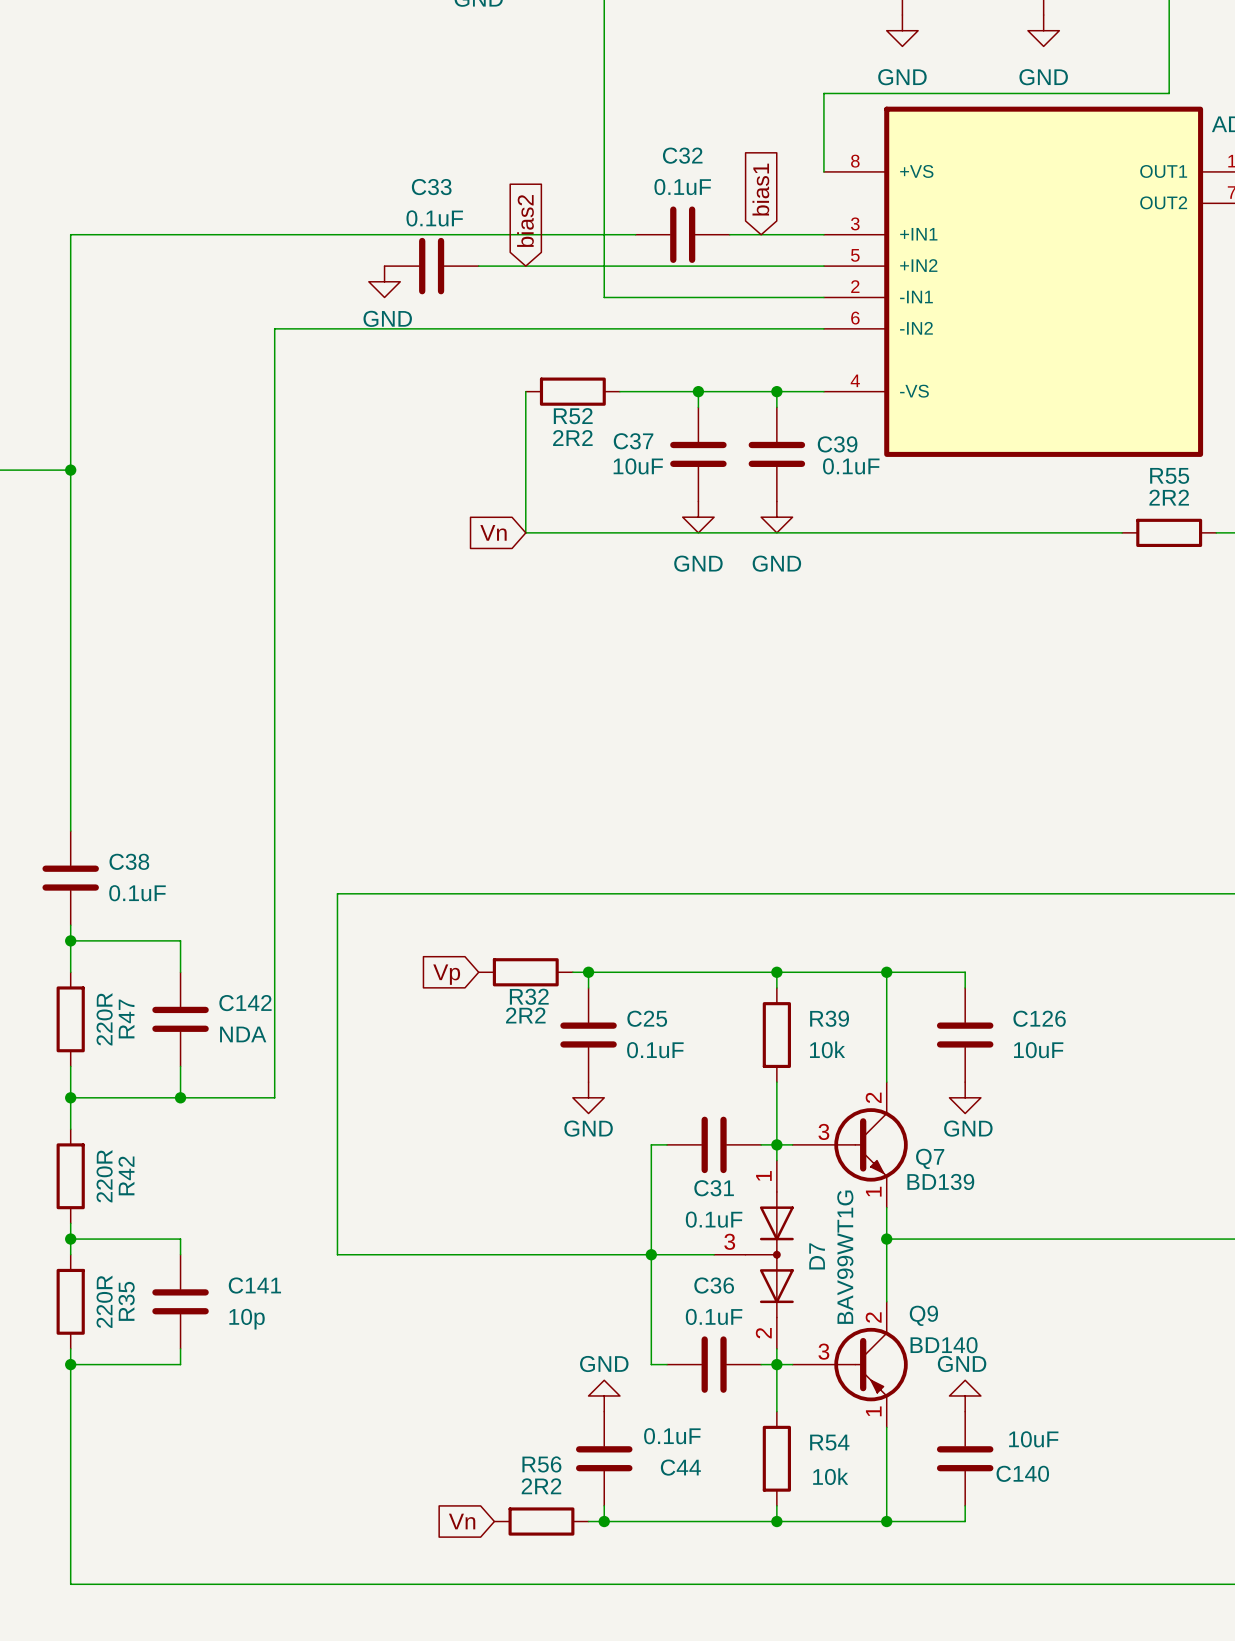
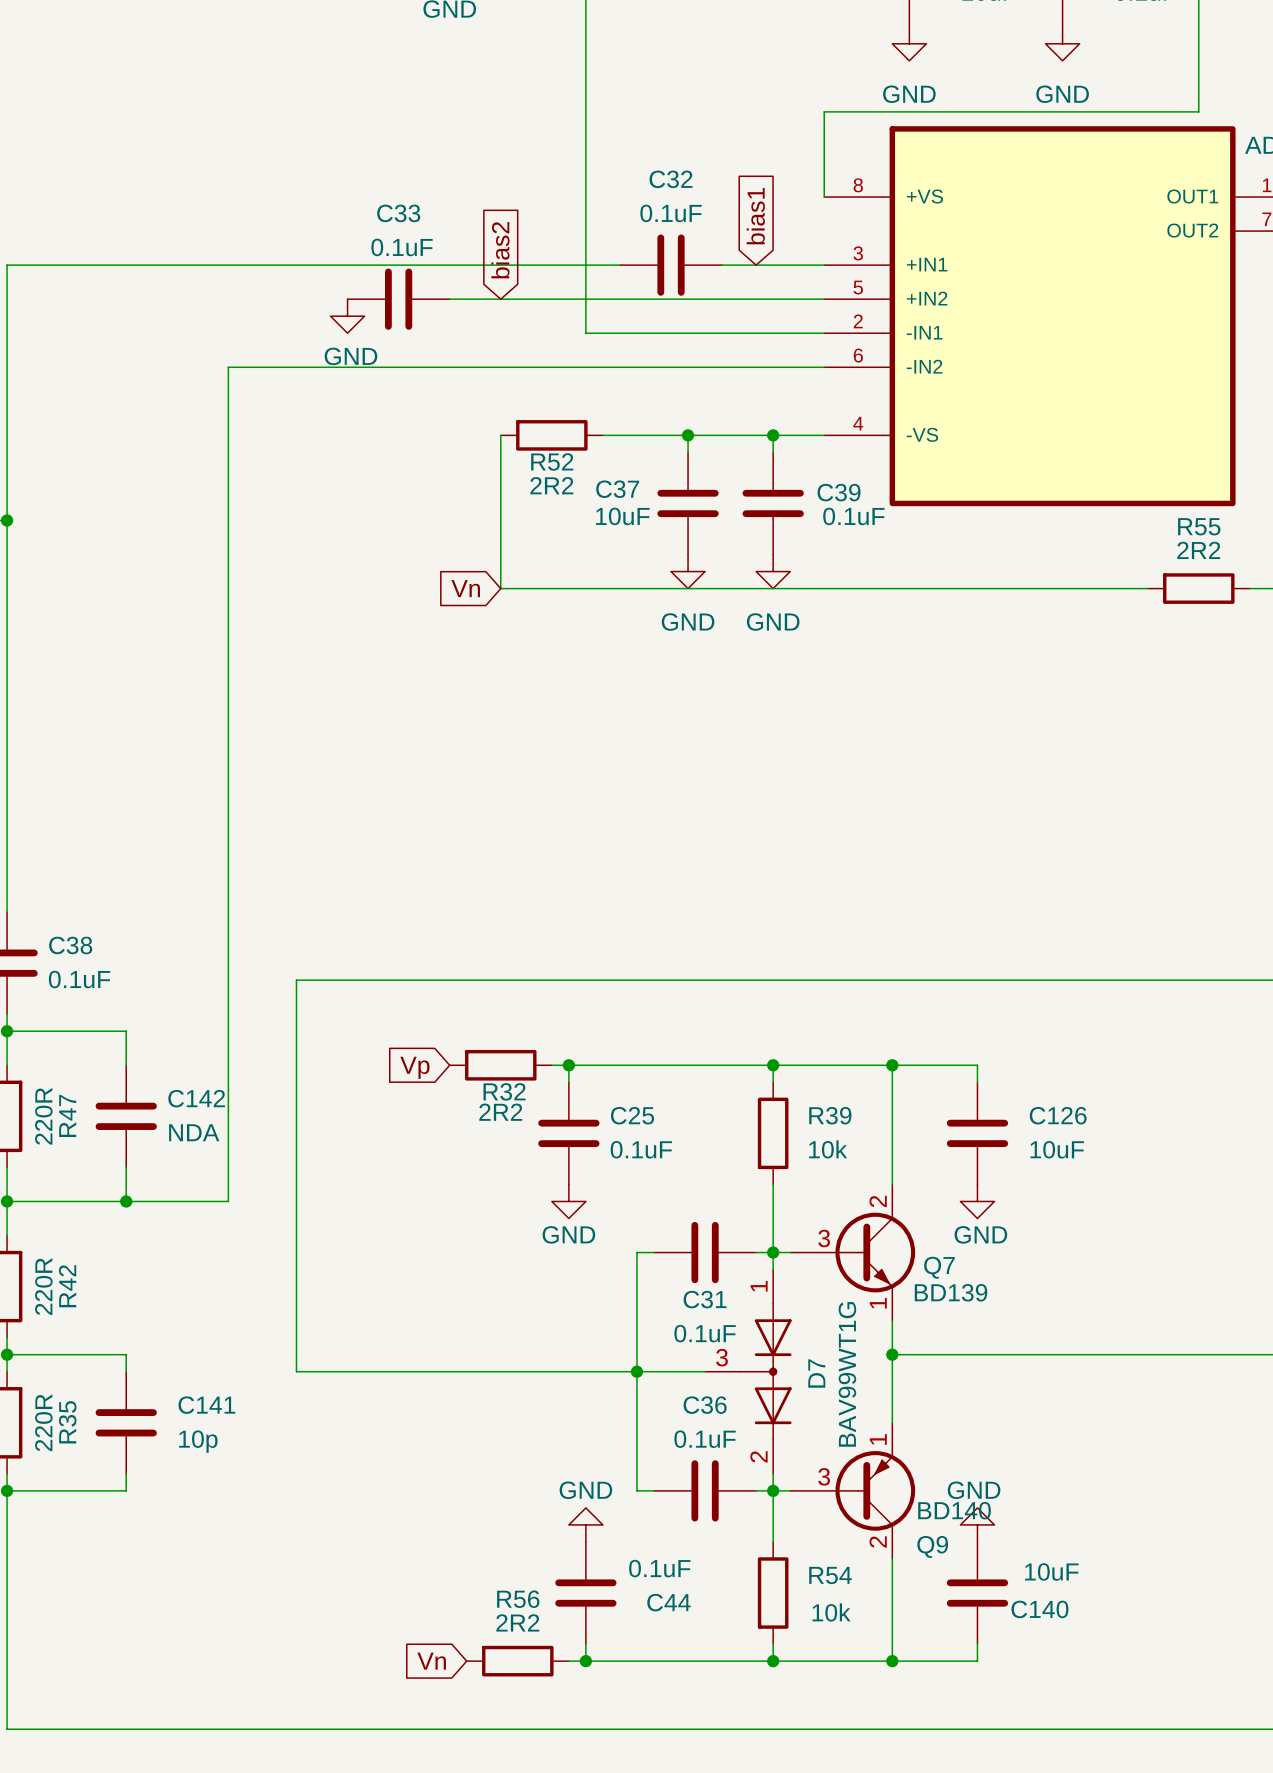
Q9 flip: as is (871, 1364) -> up-down (875, 1490)

